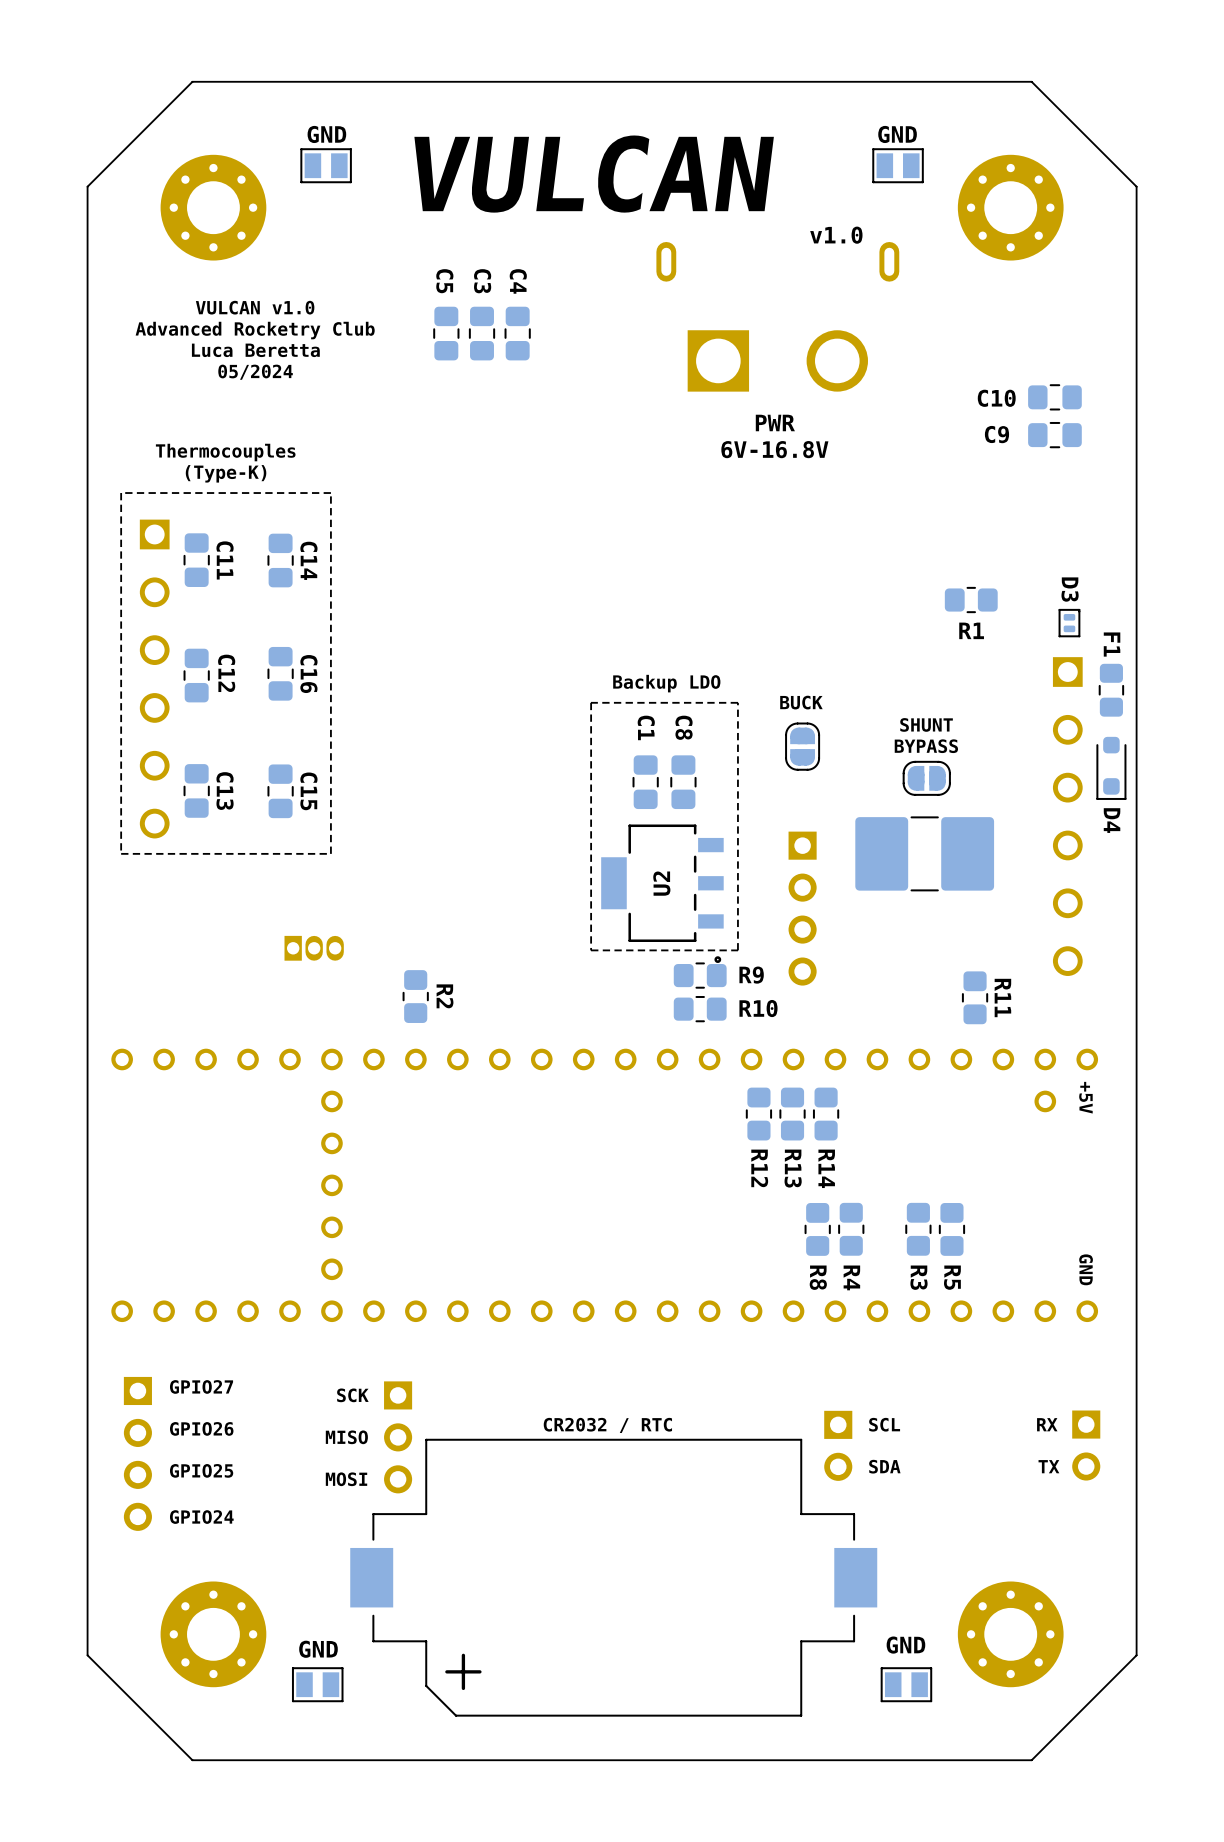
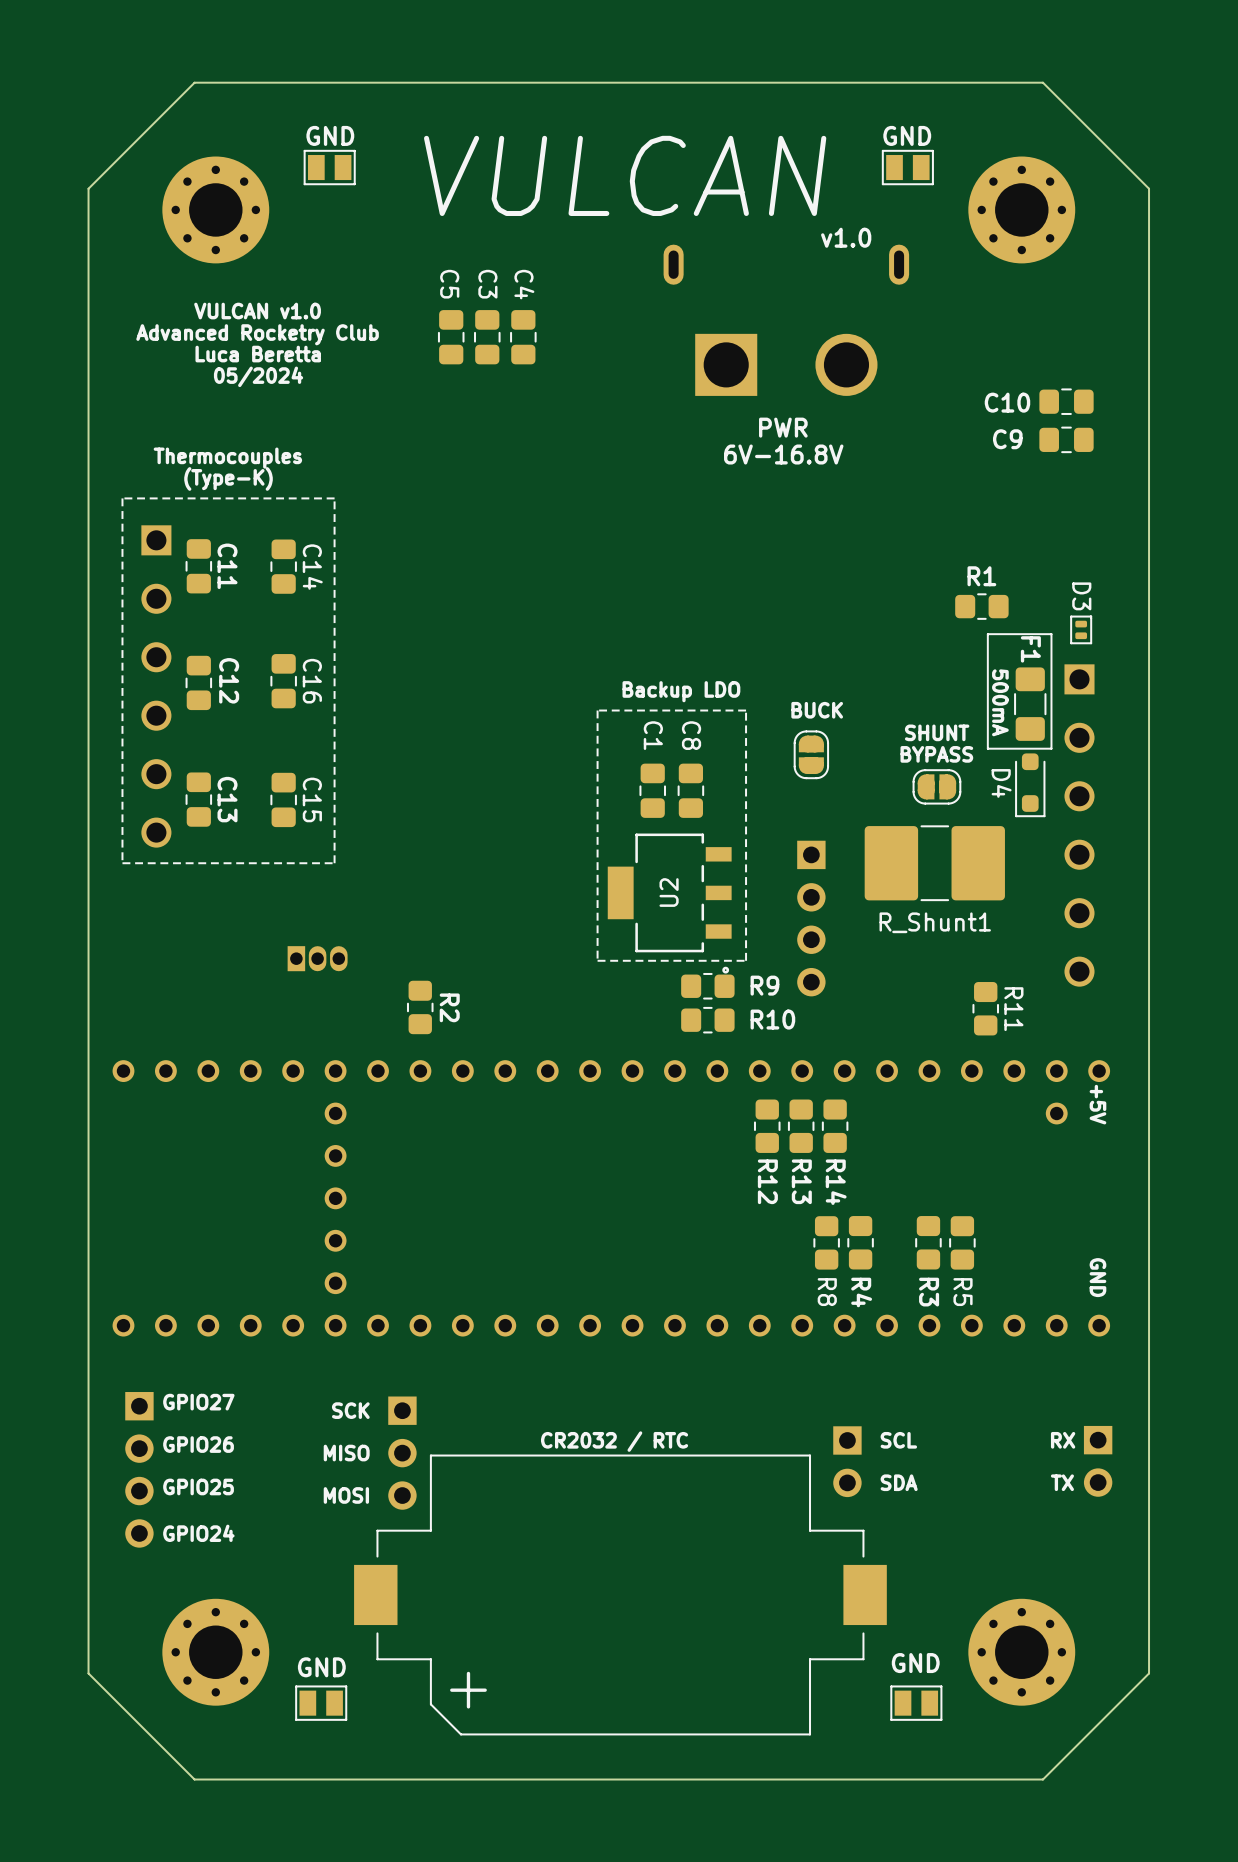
line: none -> (1051, 634) (987, 634) (987, 748) (1051, 748) (1051, 634)
R1 name position: R1 (971, 630) -> R1 (981, 576)
F1 footprint: [1098, 663, 1125, 717] -> [1014, 667, 1047, 741]
text: none -> 500mA (1000, 702)
D4 position: (1111, 768) -> (1030, 785)
D4 name position: D4 (1112, 820) -> D4 (1001, 783)
R_Shunt1 name: none -> R_Shunt1 (935, 922)

